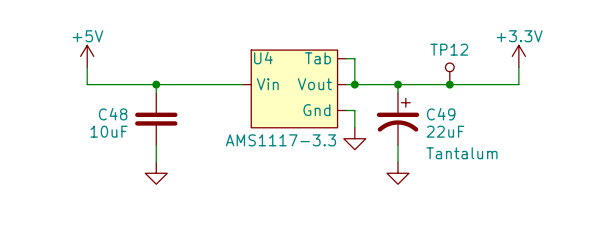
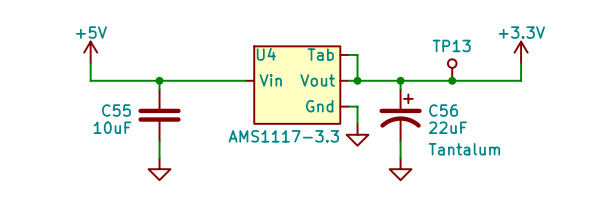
TP12 name: TP12 (449, 49) -> TP13 (451, 45)
C48 name: C48 (113, 114) -> C55 (116, 110)
C49 name: C49 (441, 114) -> C56 (443, 110)

